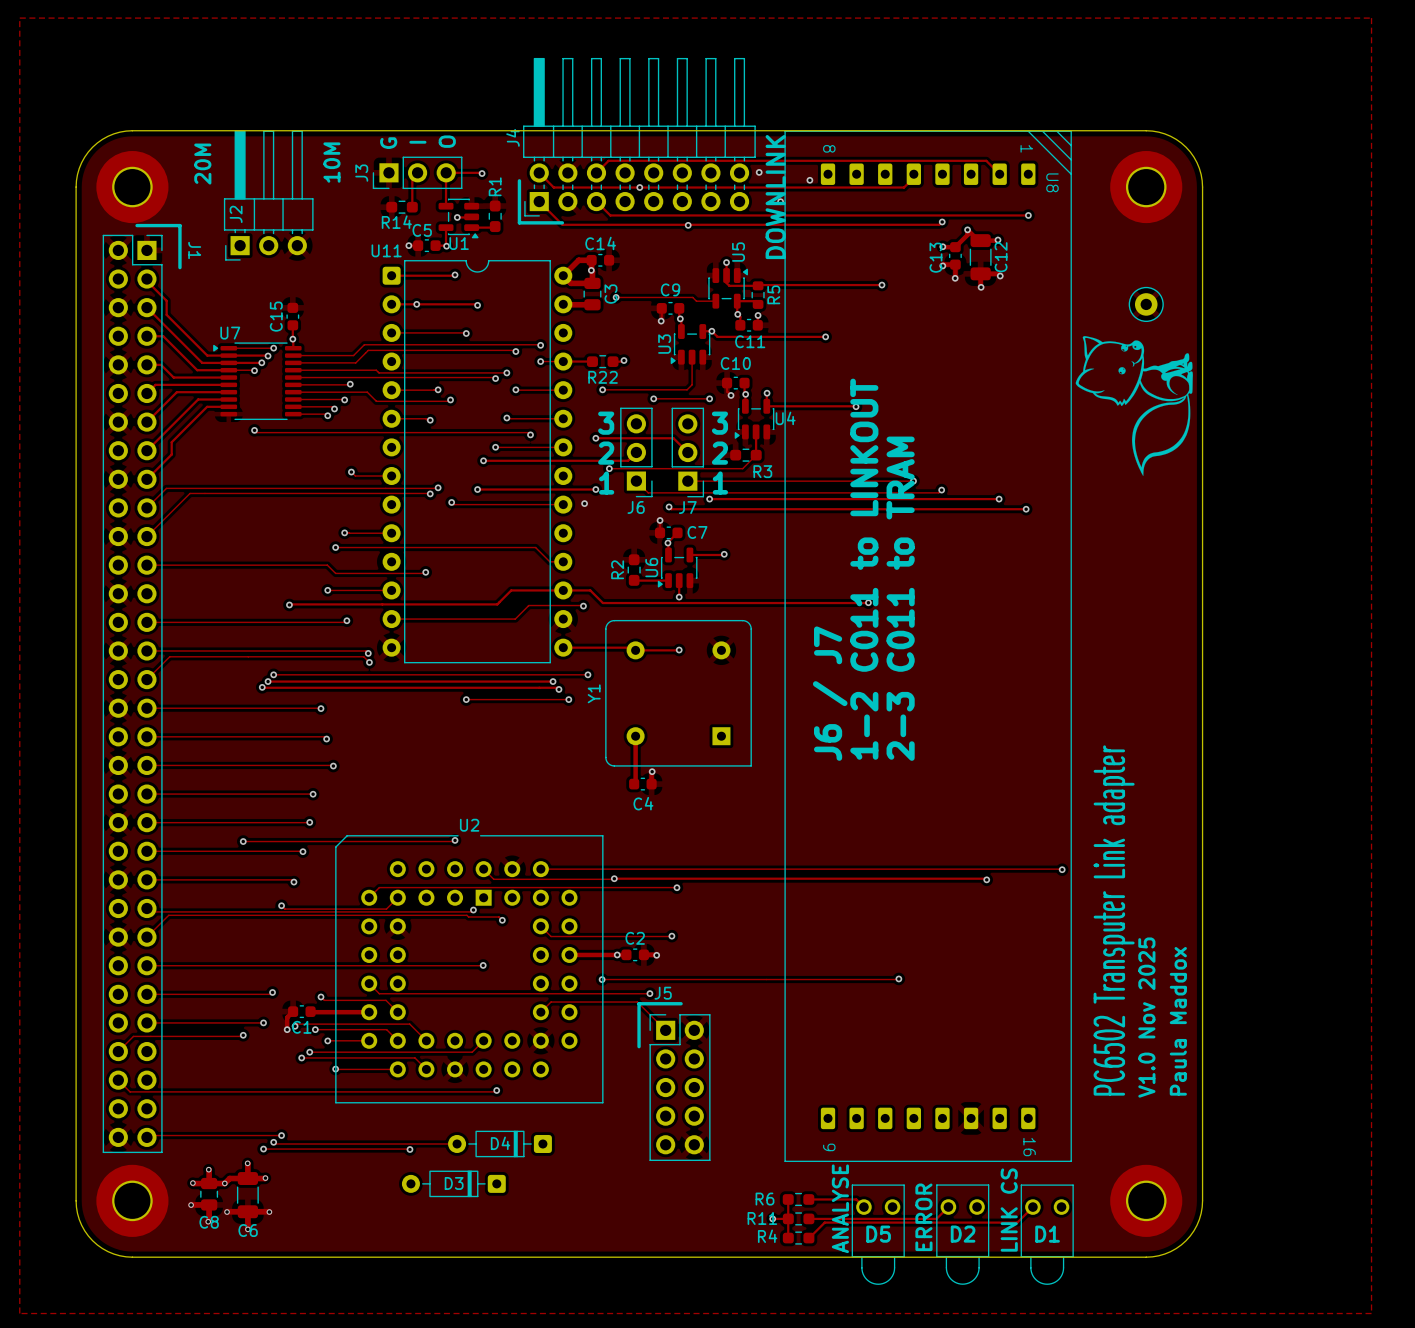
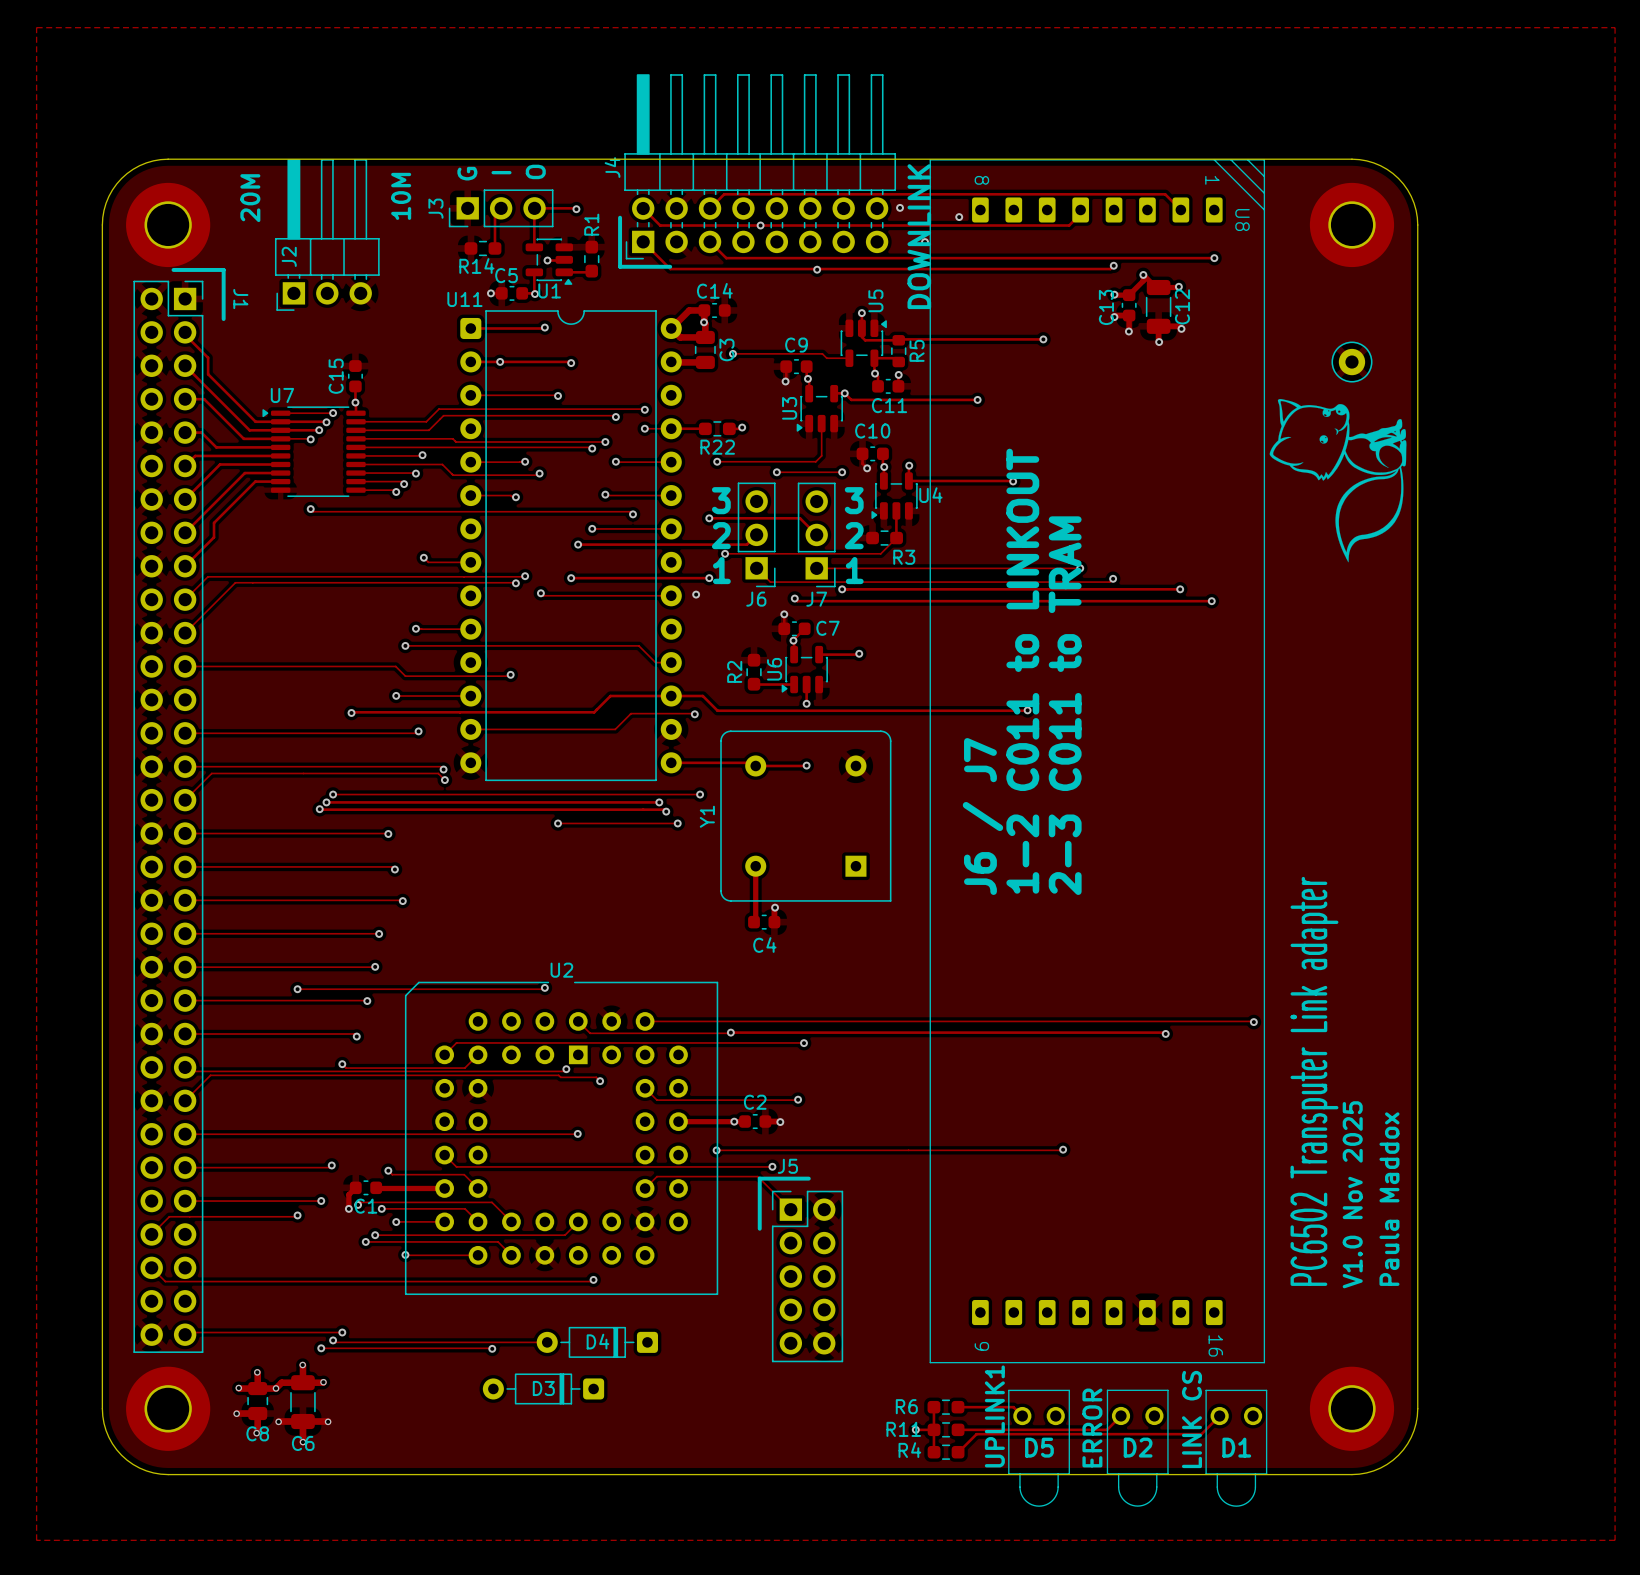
text: ANALYSE (840, 1208) -> UPLINK1 (994, 1416)

